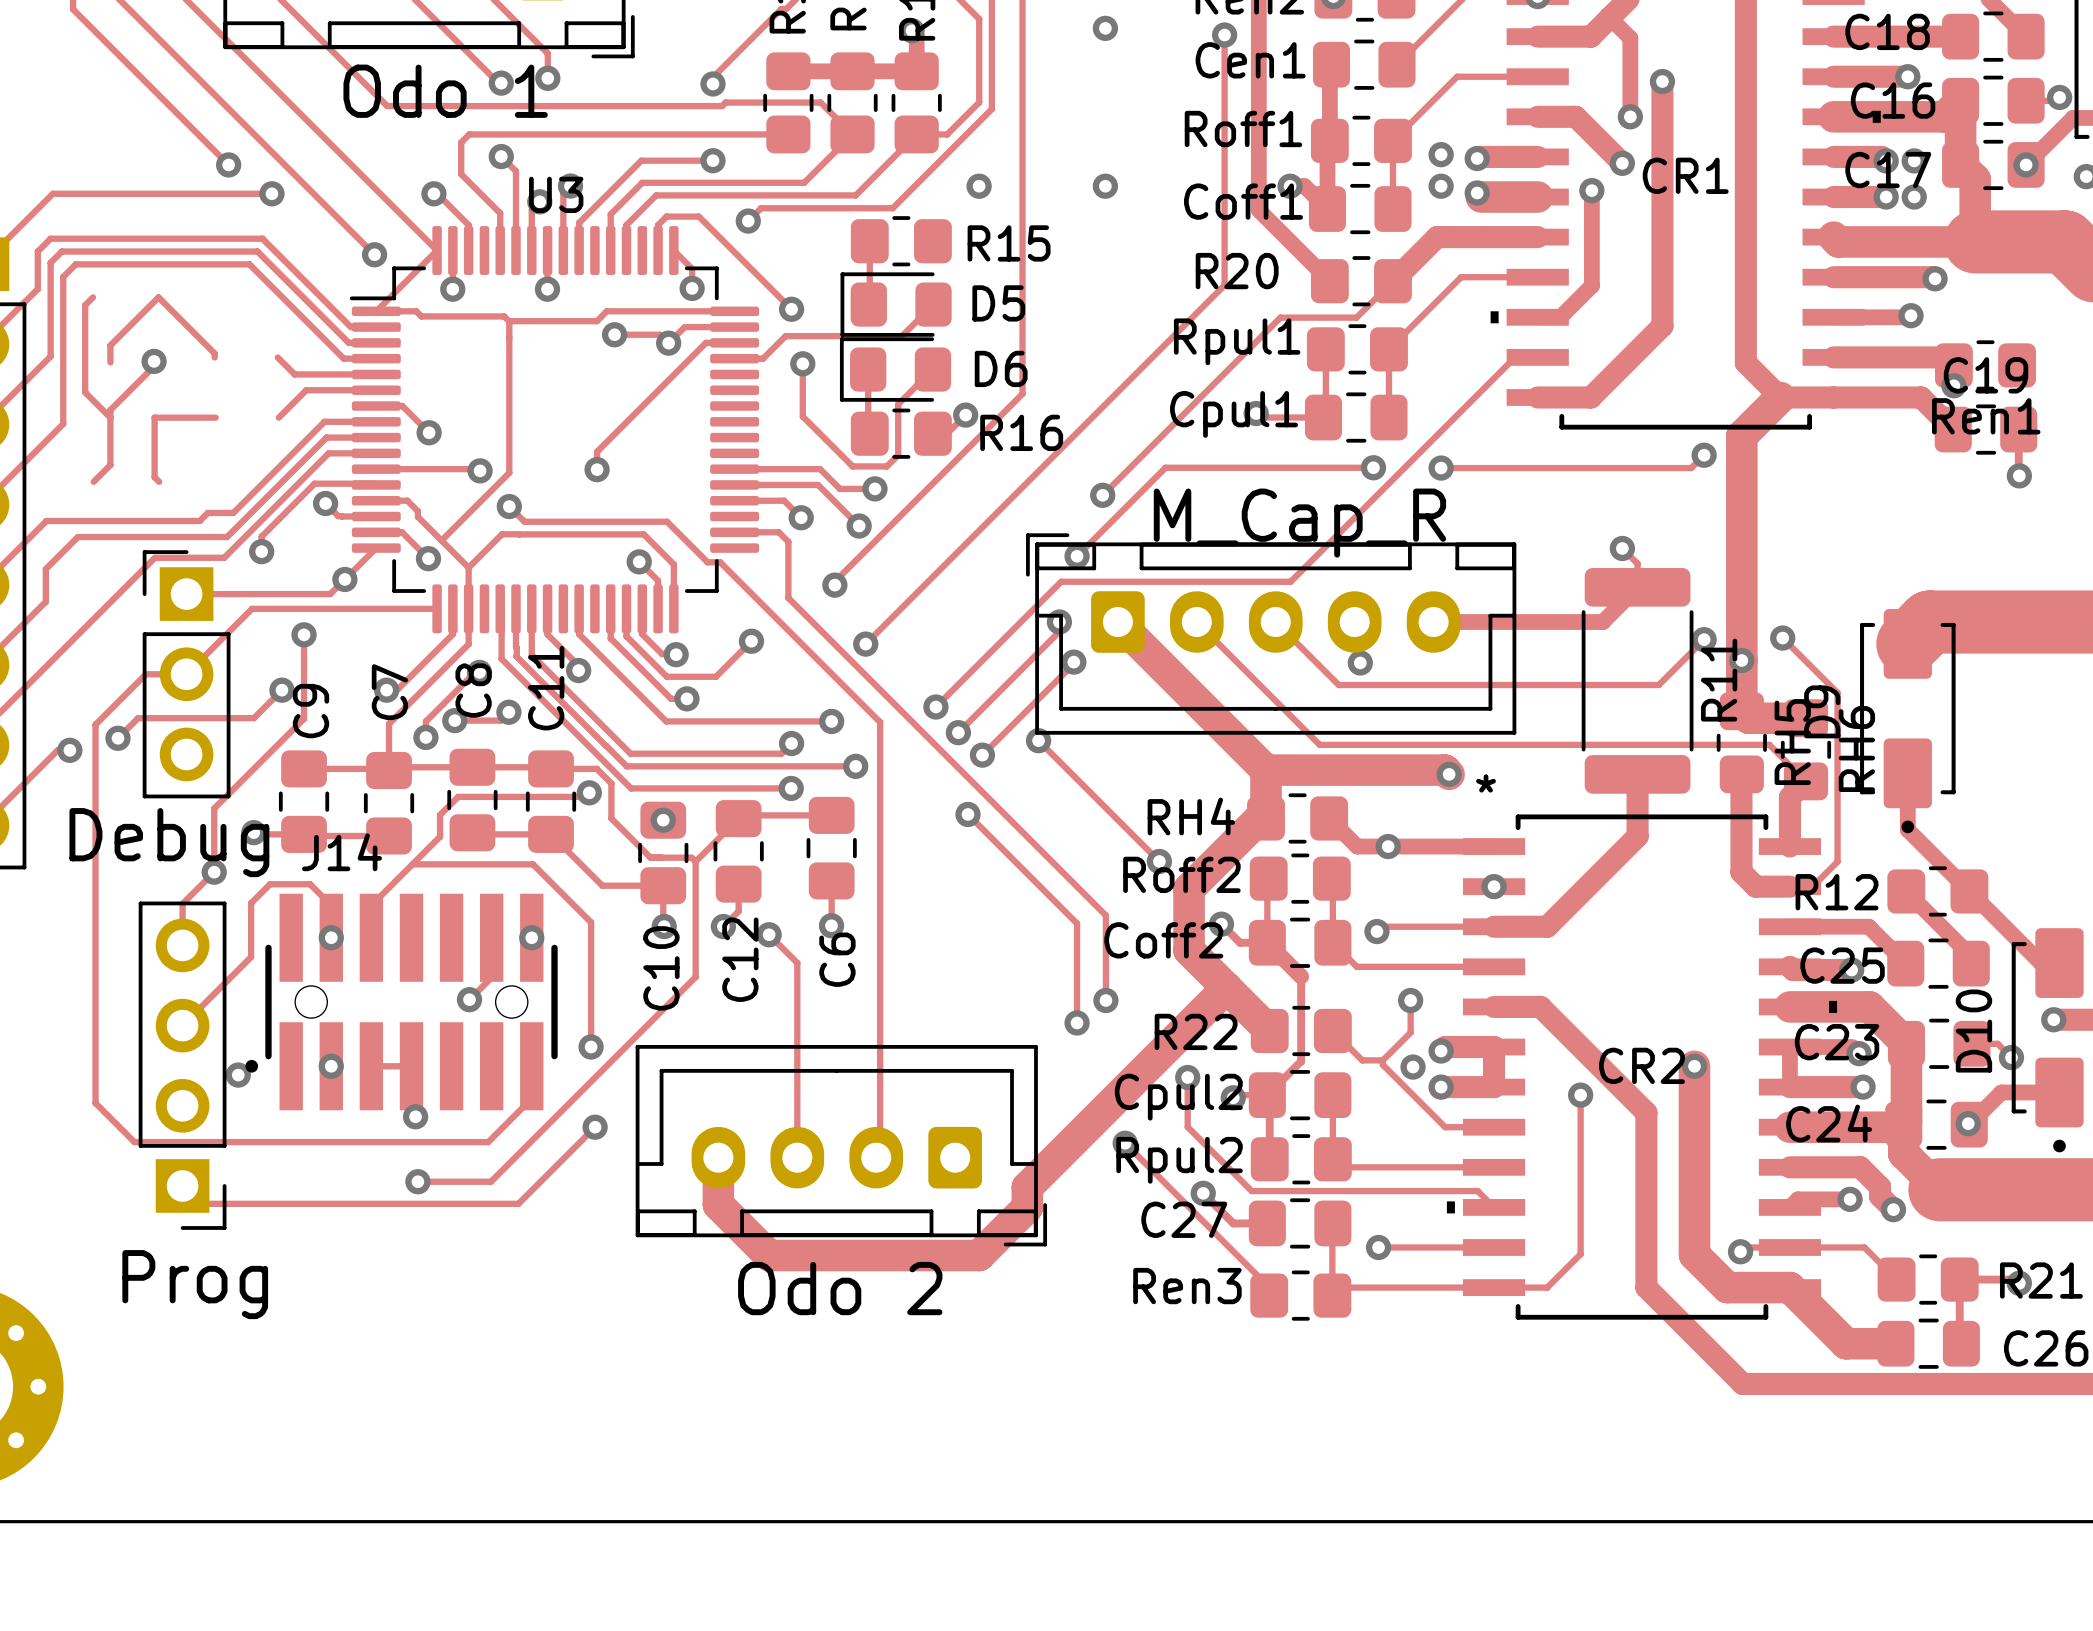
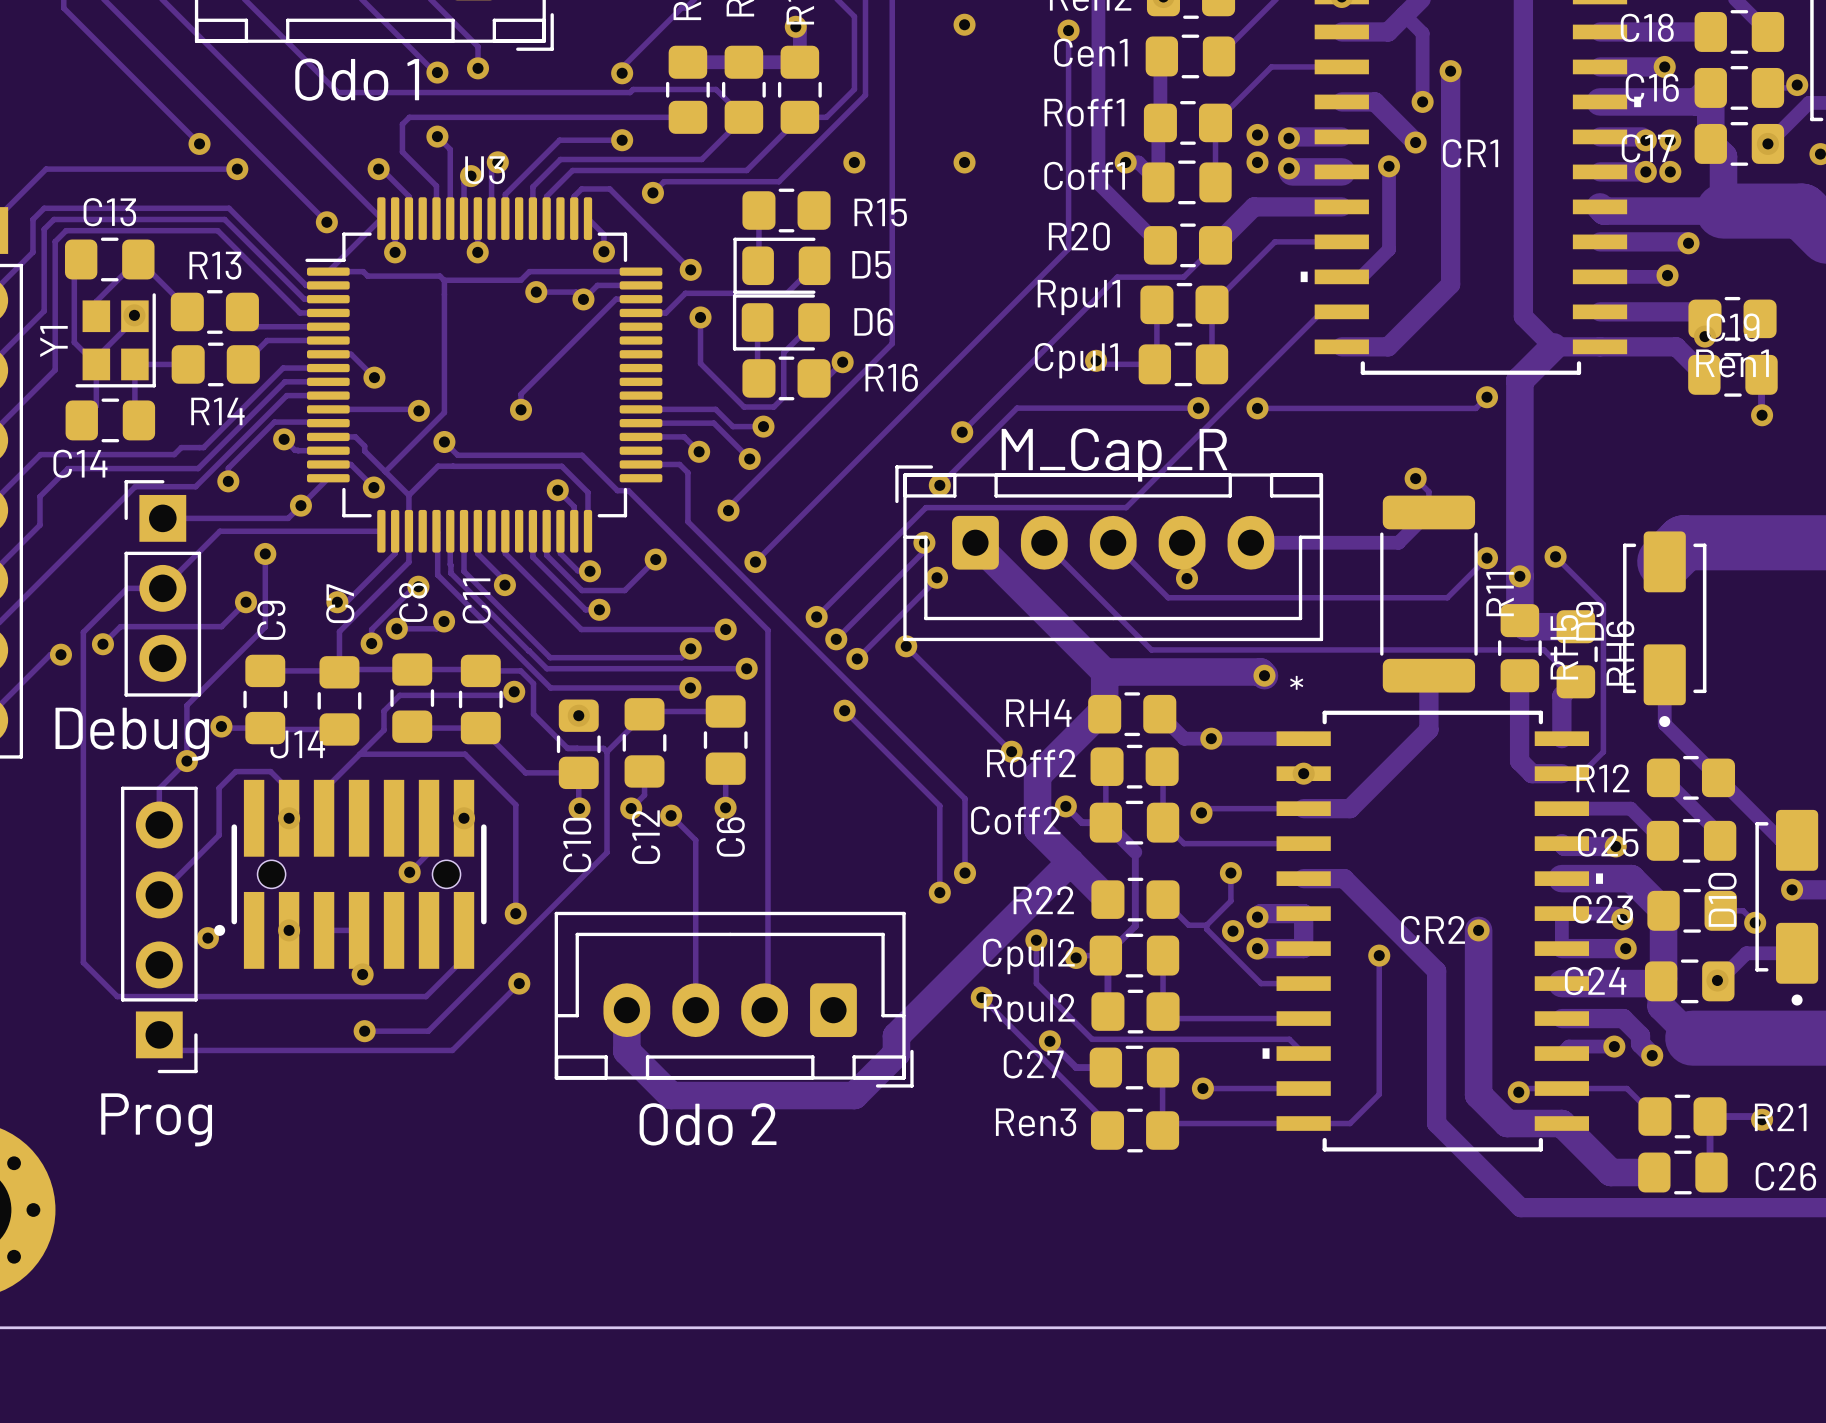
C13: none -> (109, 259)
R13: none -> (214, 311)
Y1: none -> (115, 340)
R14: none -> (215, 364)
C14: none -> (110, 420)

